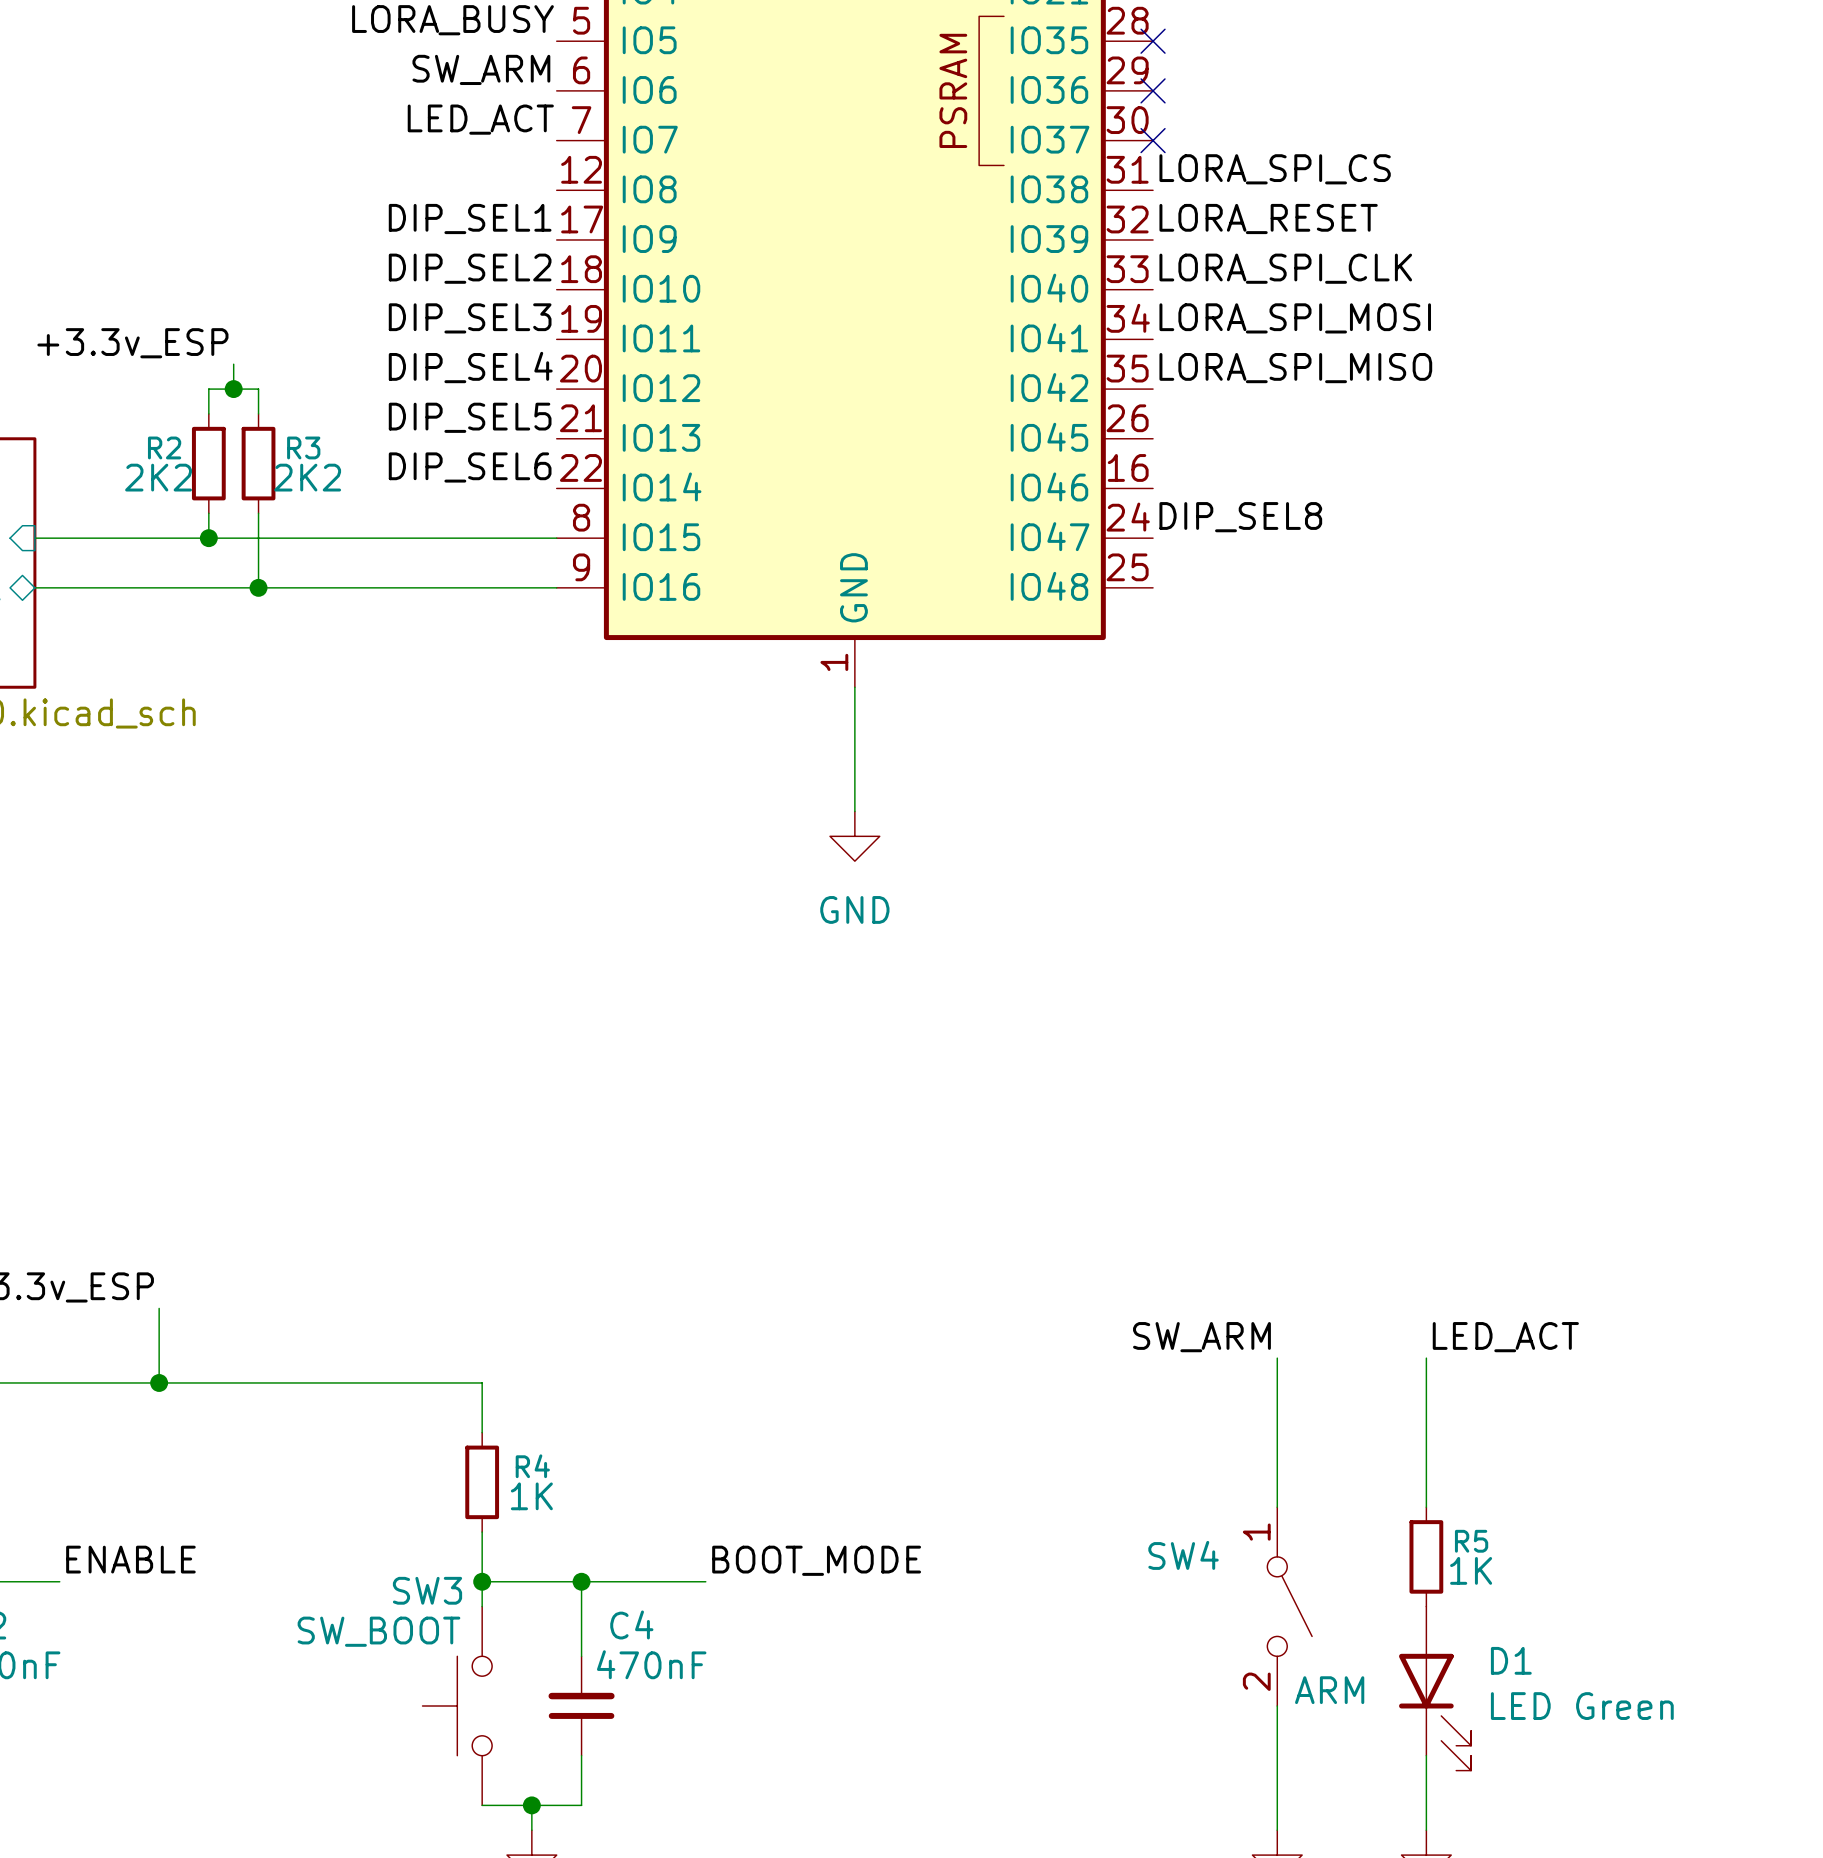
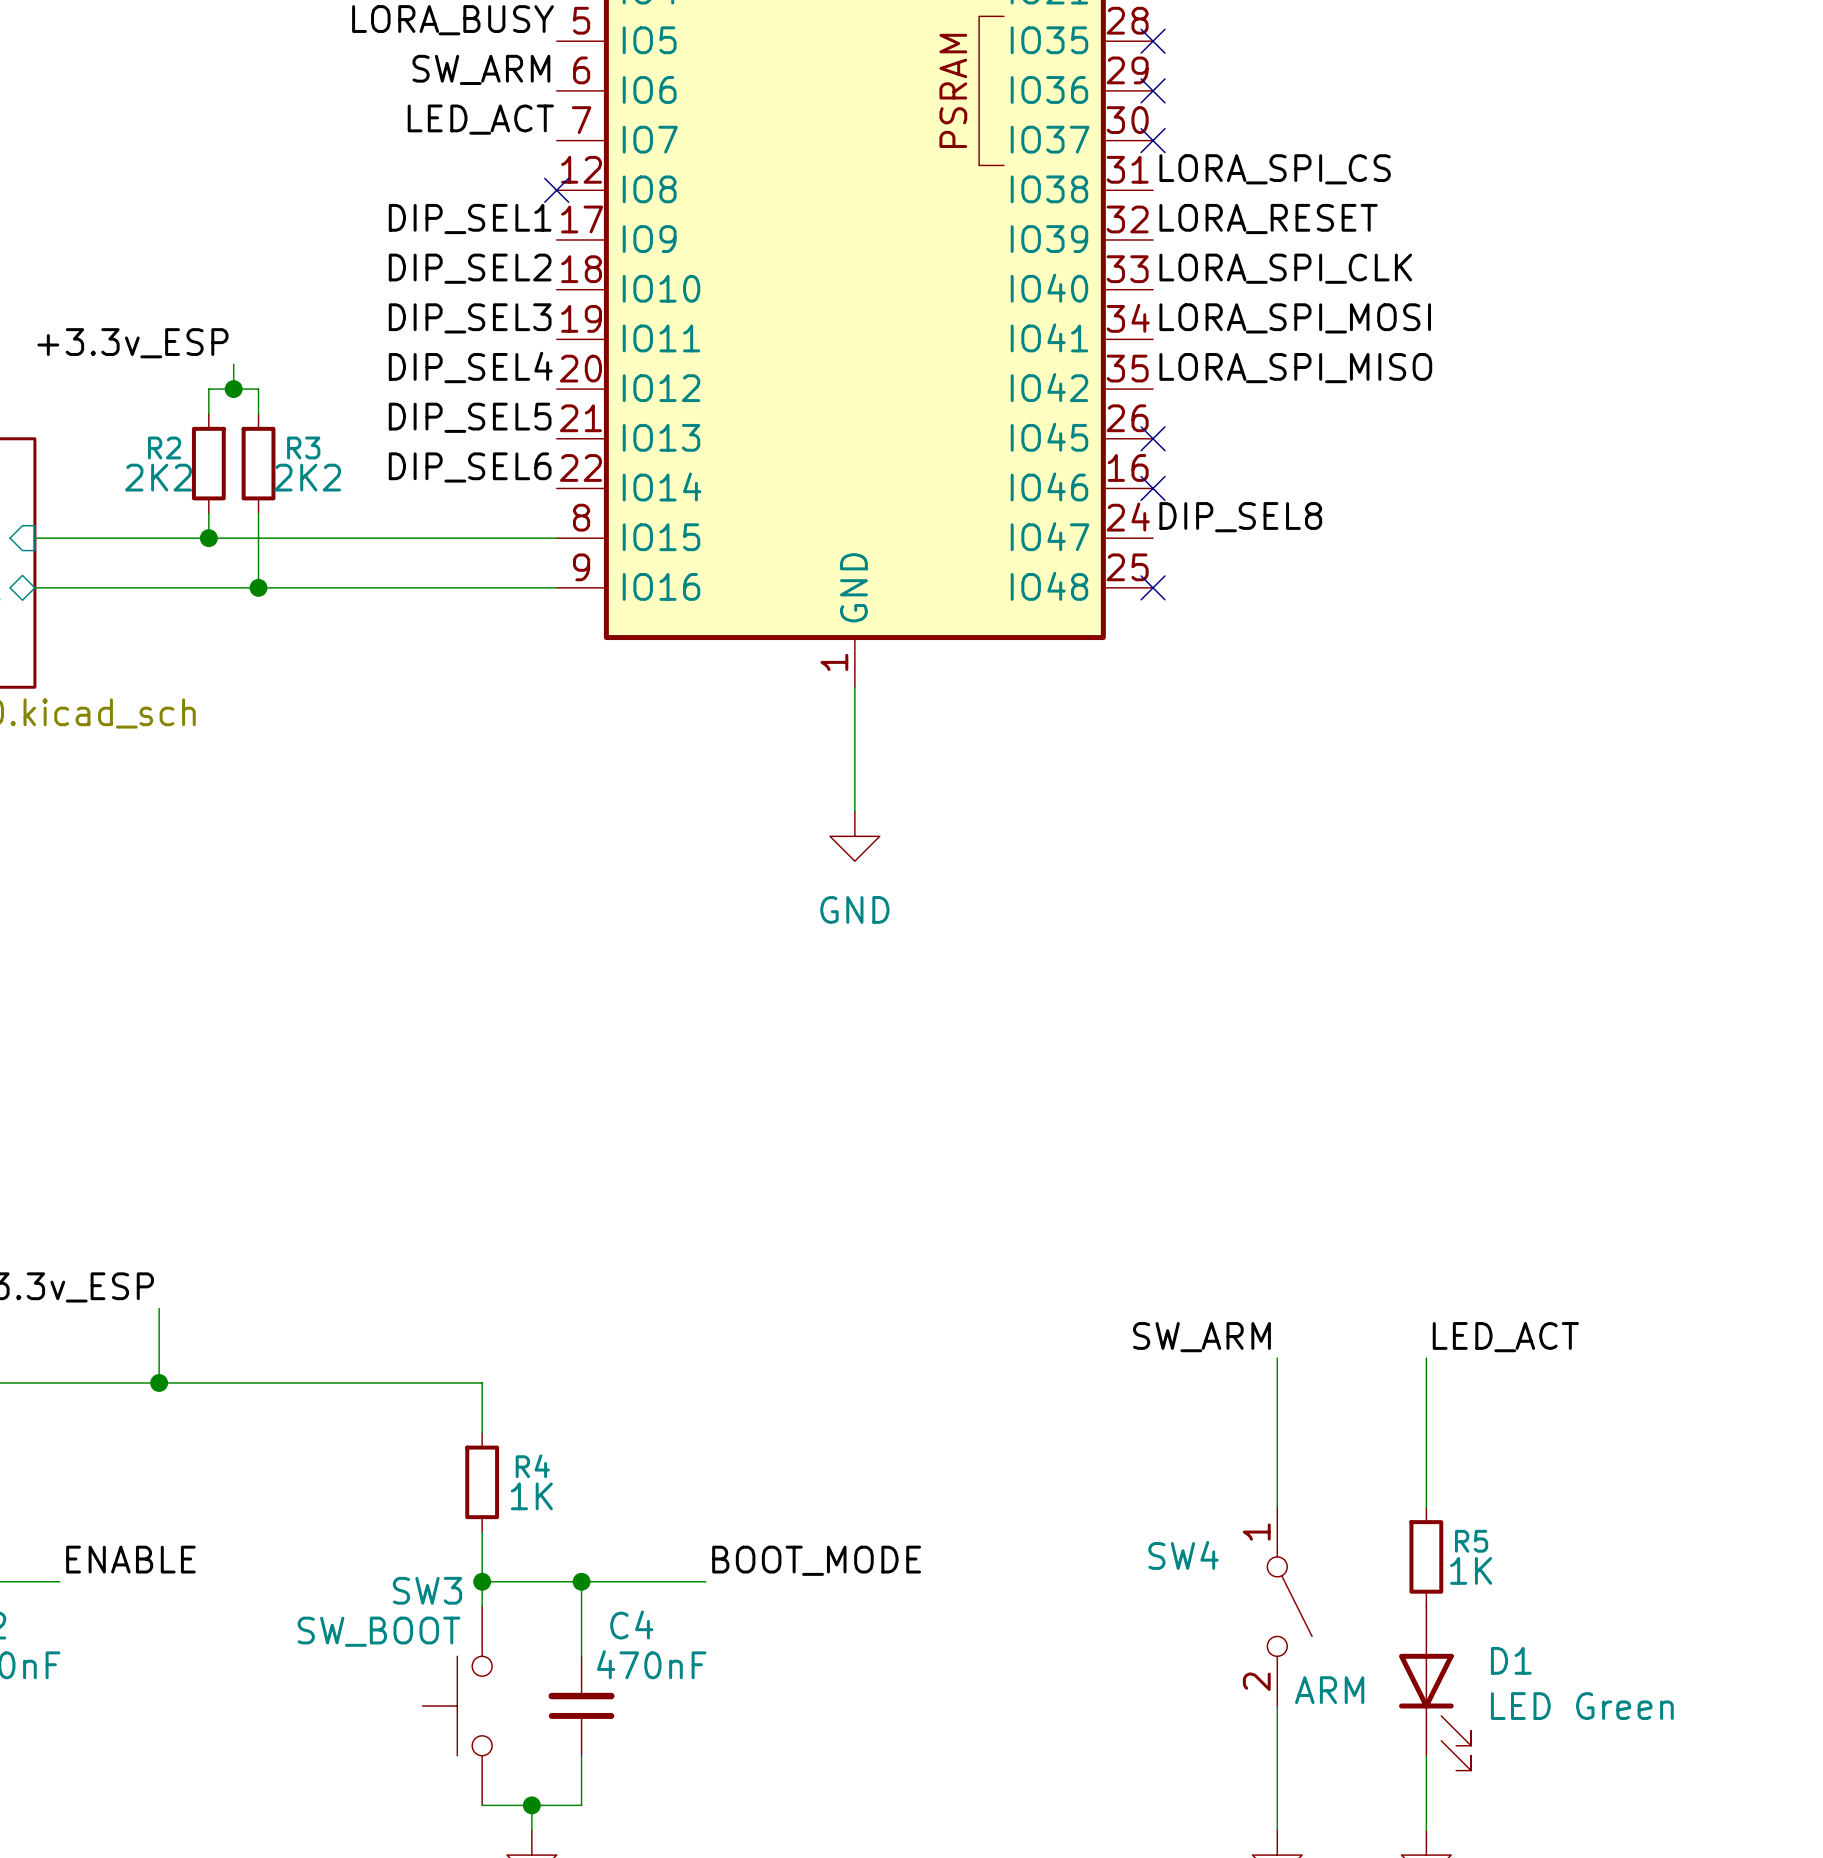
no-connect mark: none -> (556, 190)
no-connect mark: none -> (1153, 438)
no-connect mark: none -> (1153, 488)
no-connect mark: none -> (1153, 587)

